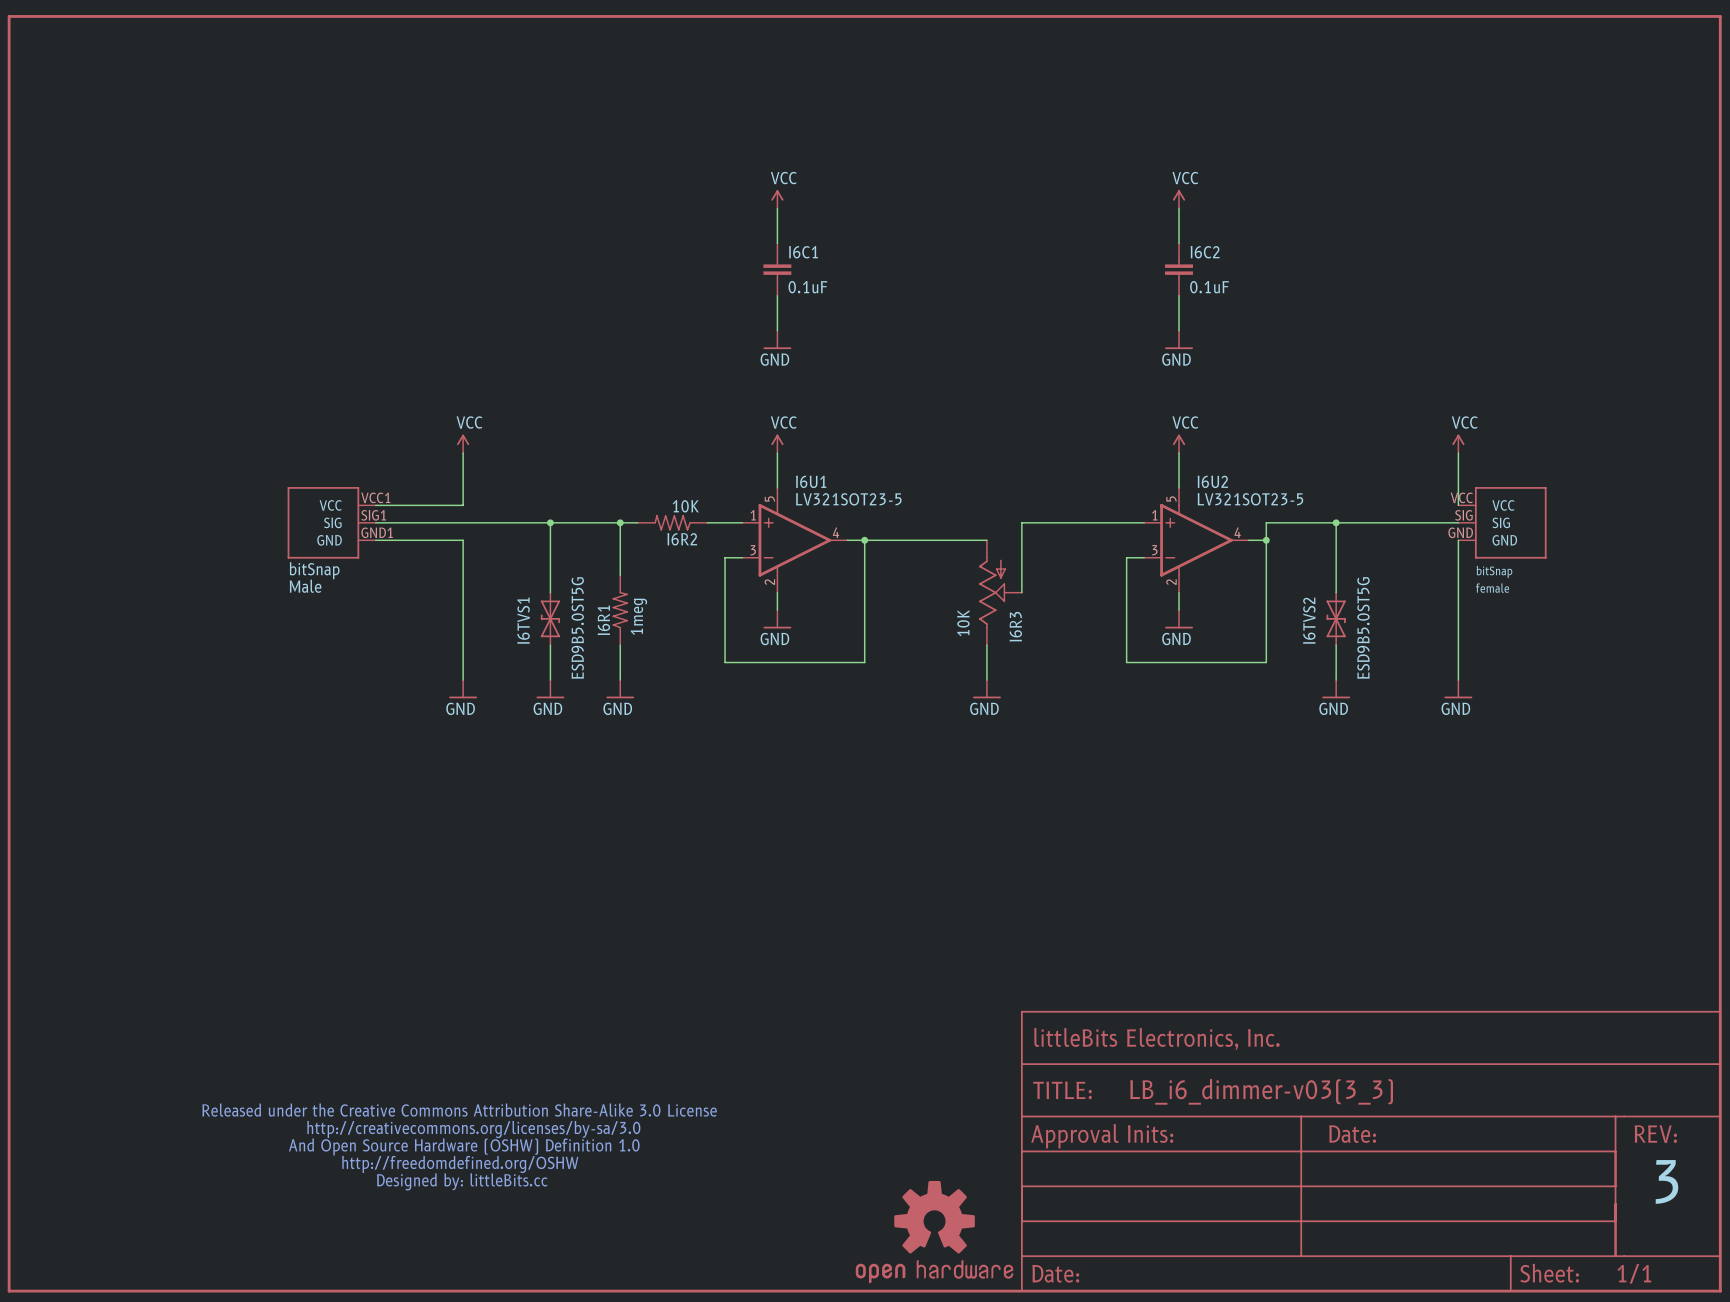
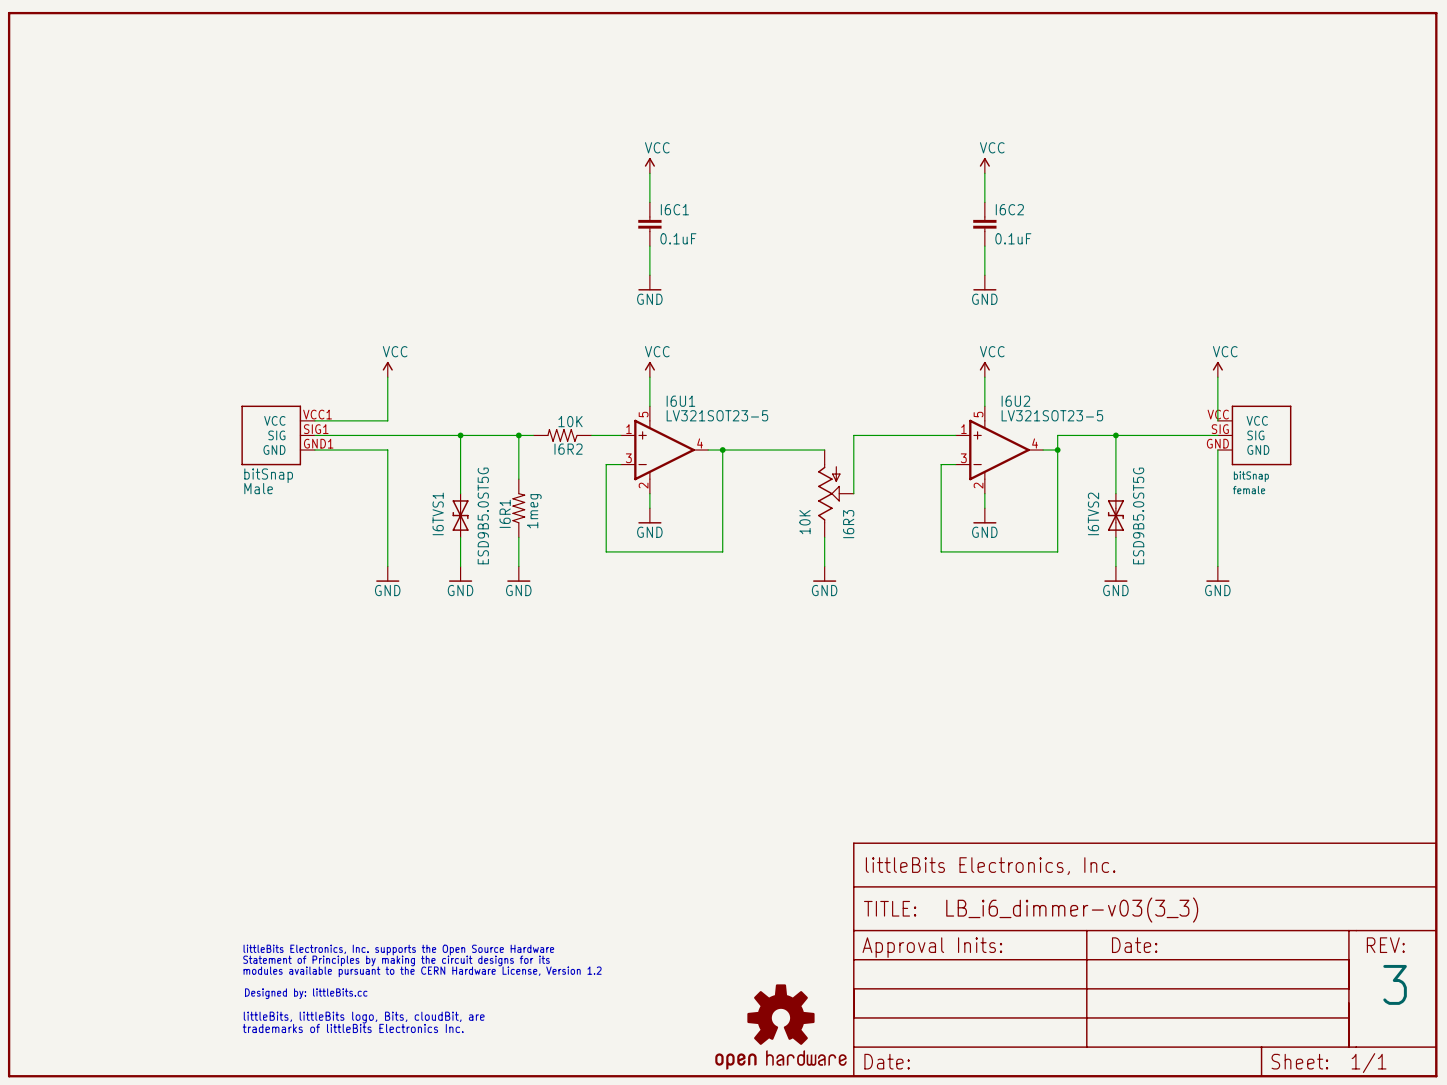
part: (459, 1146) -> none
part: none -> (422, 988)

